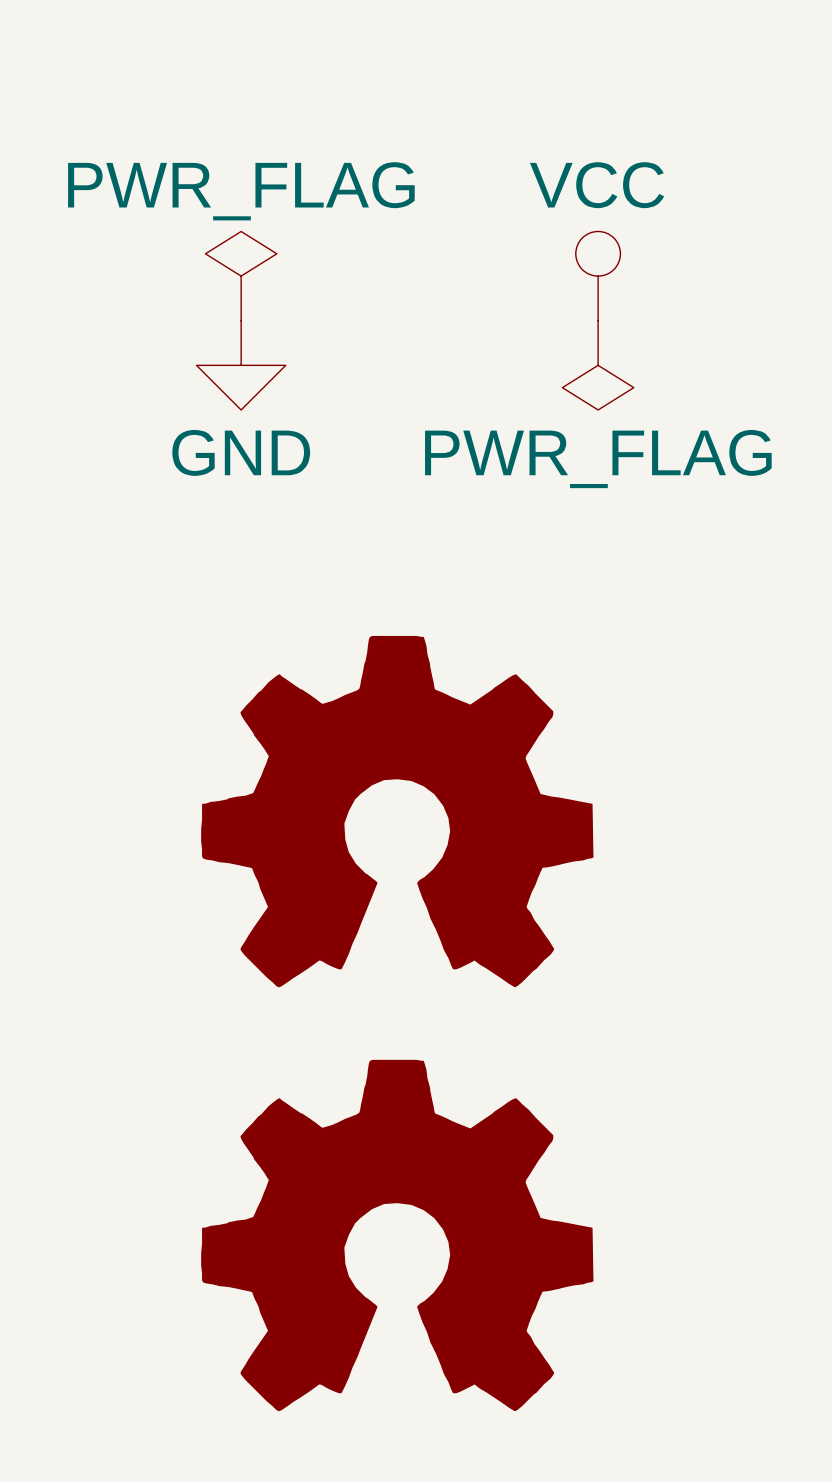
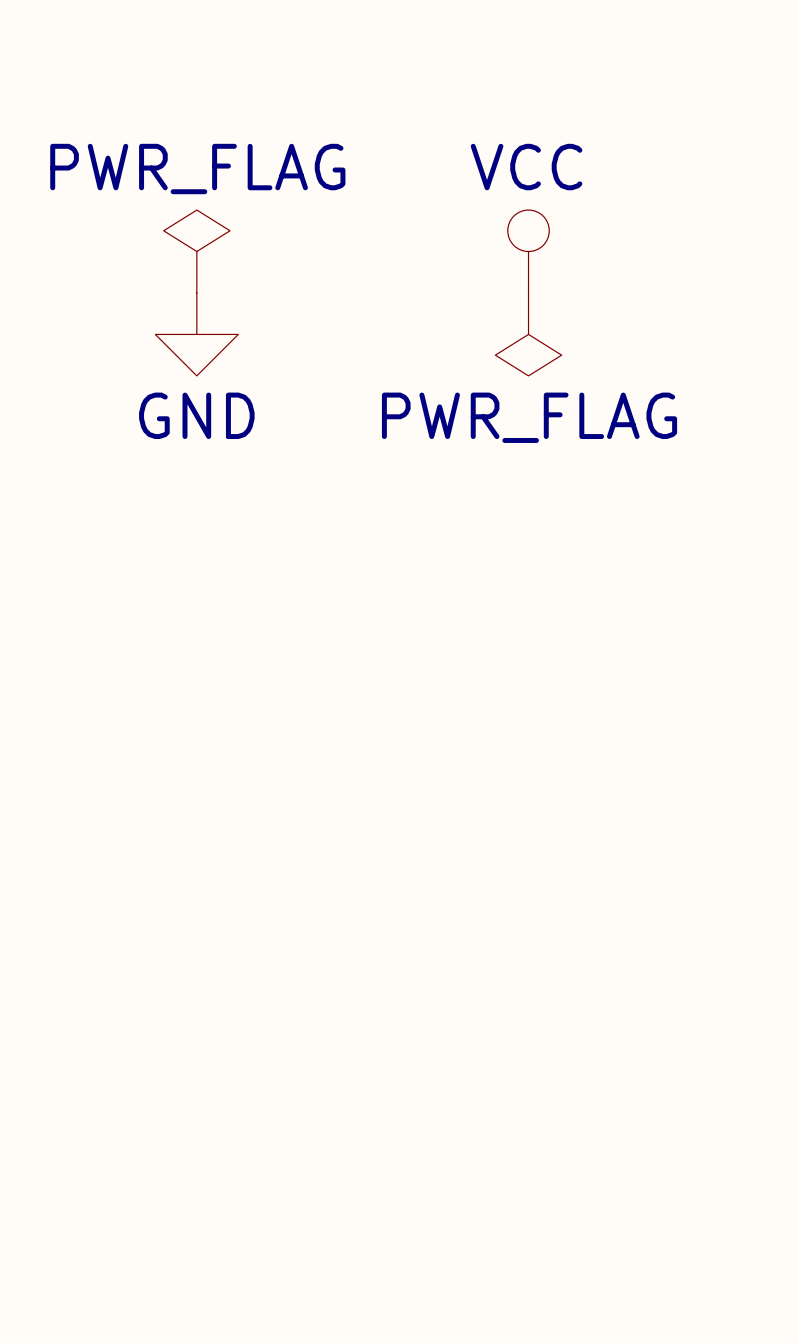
part: (397, 811) -> none
part: (397, 1235) -> none

